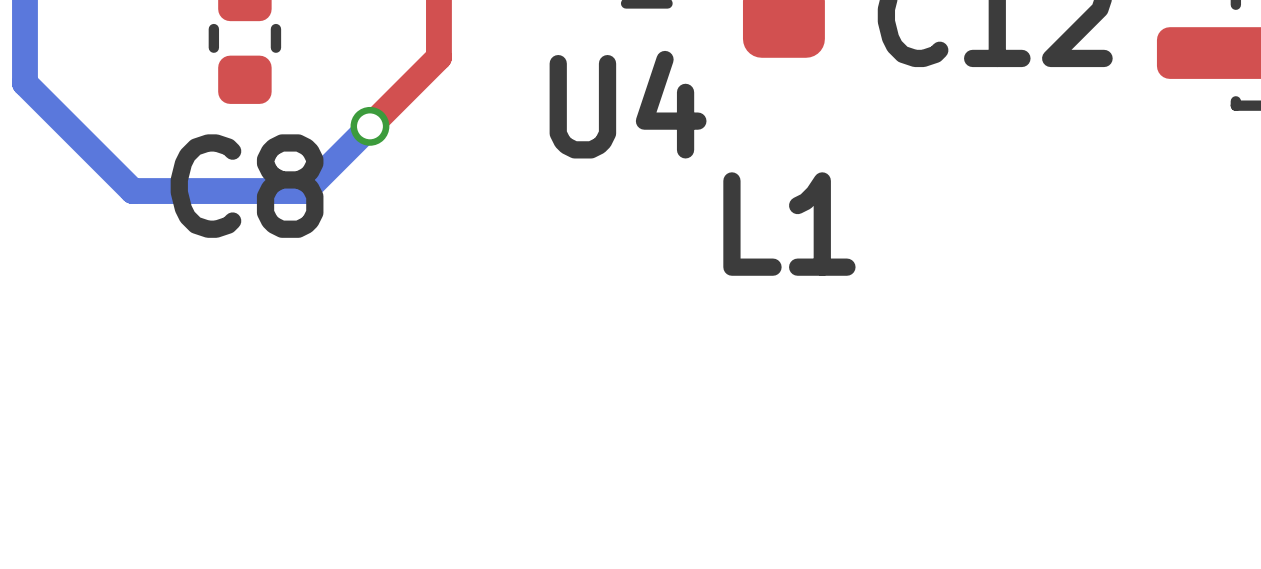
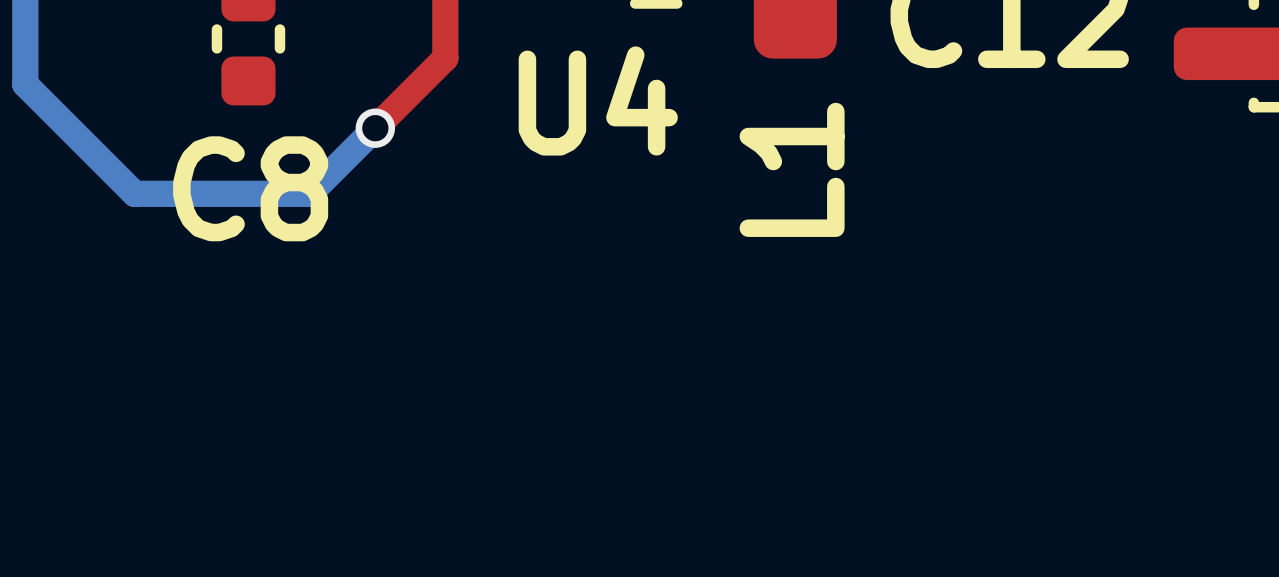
U4 name position: U4 (628, 104) -> U4 (598, 100)
L1 name rotation: 0° (789, 224) -> 90° counterclockwise (792, 169)

